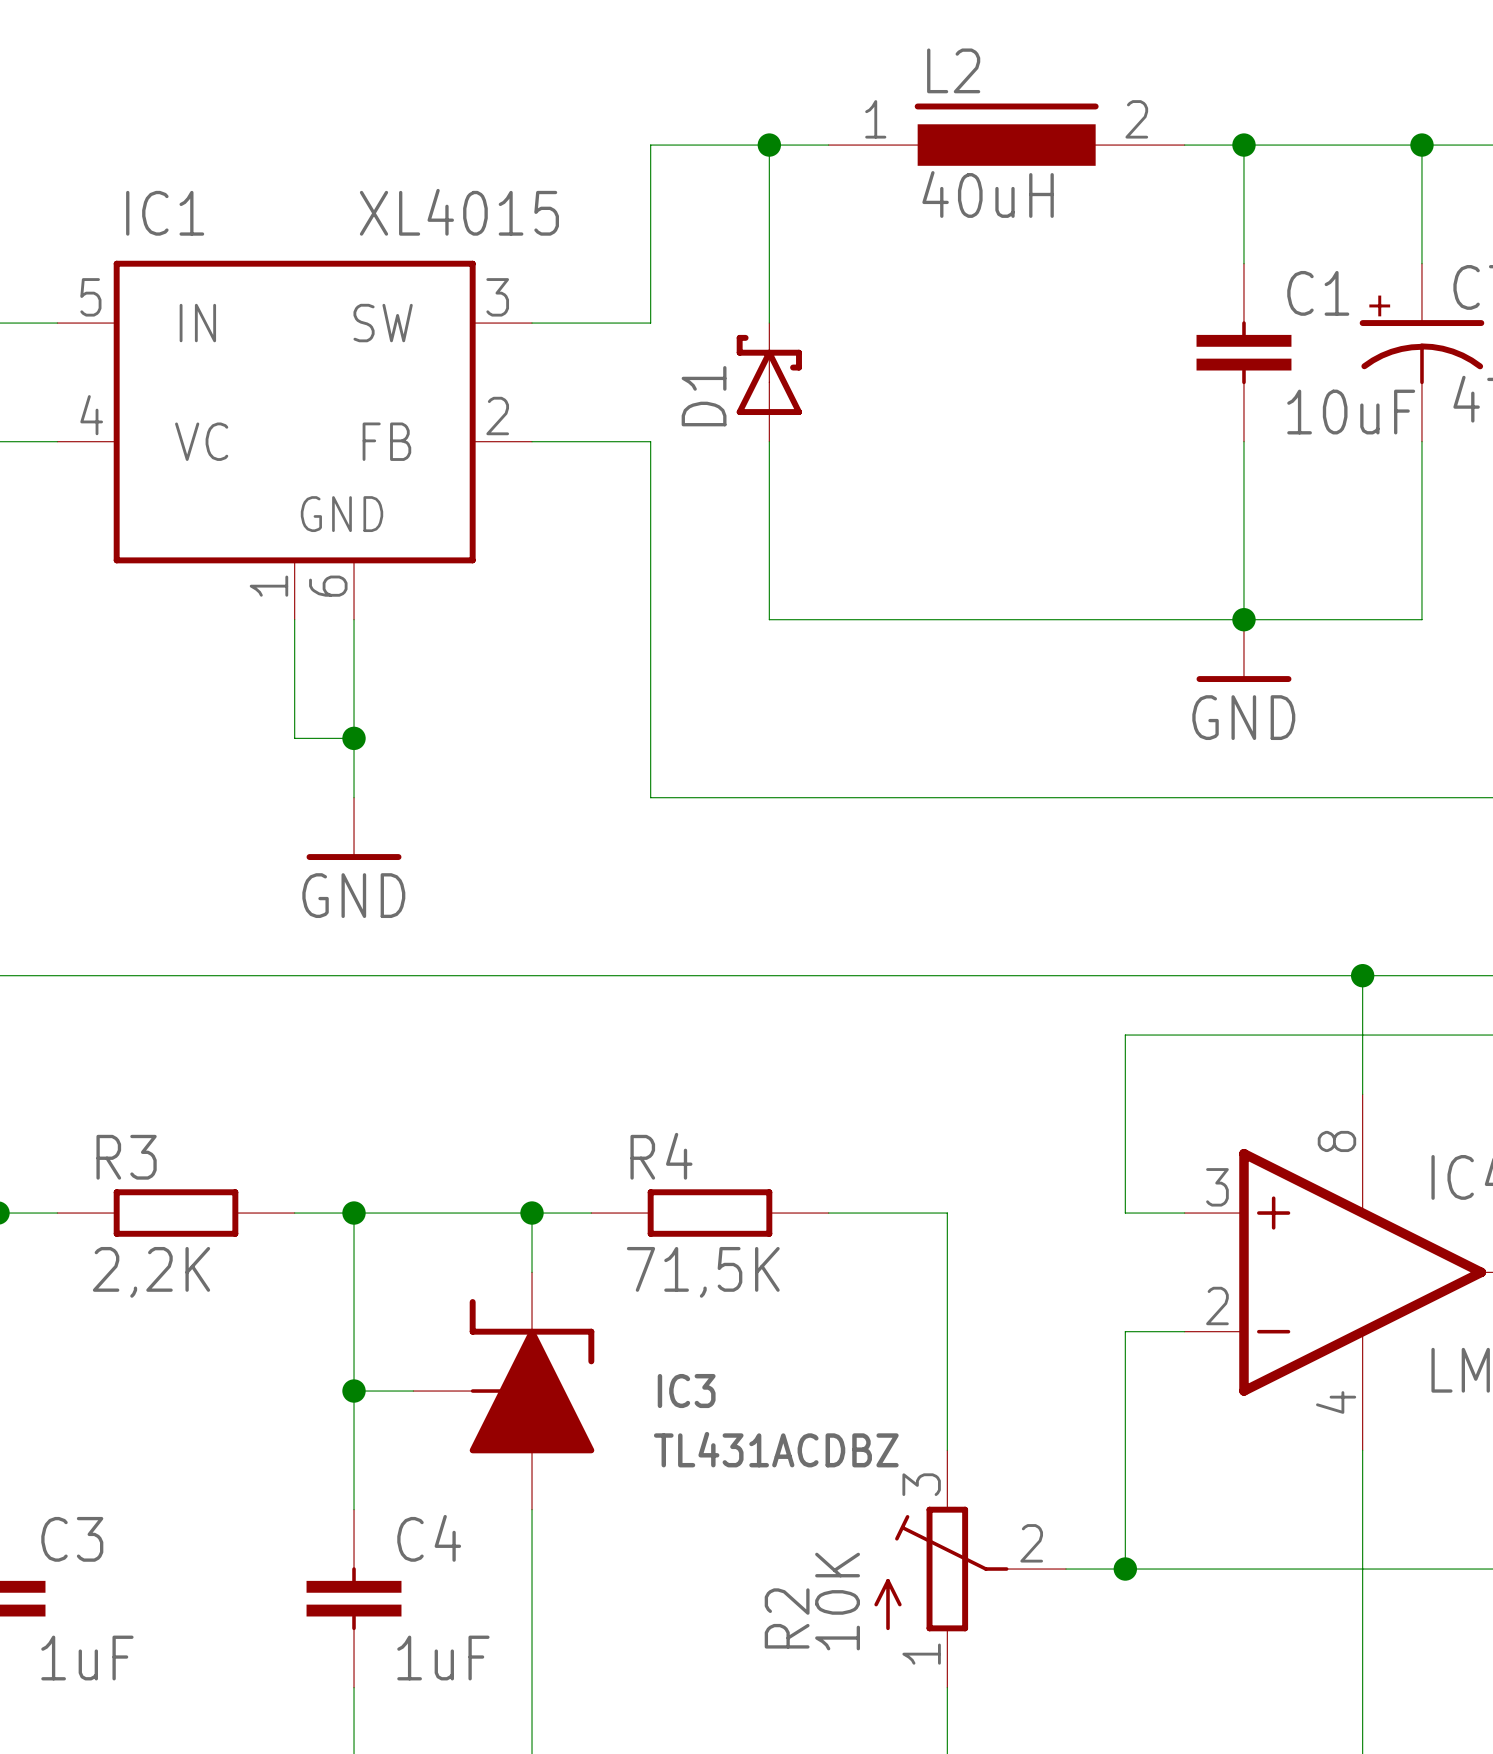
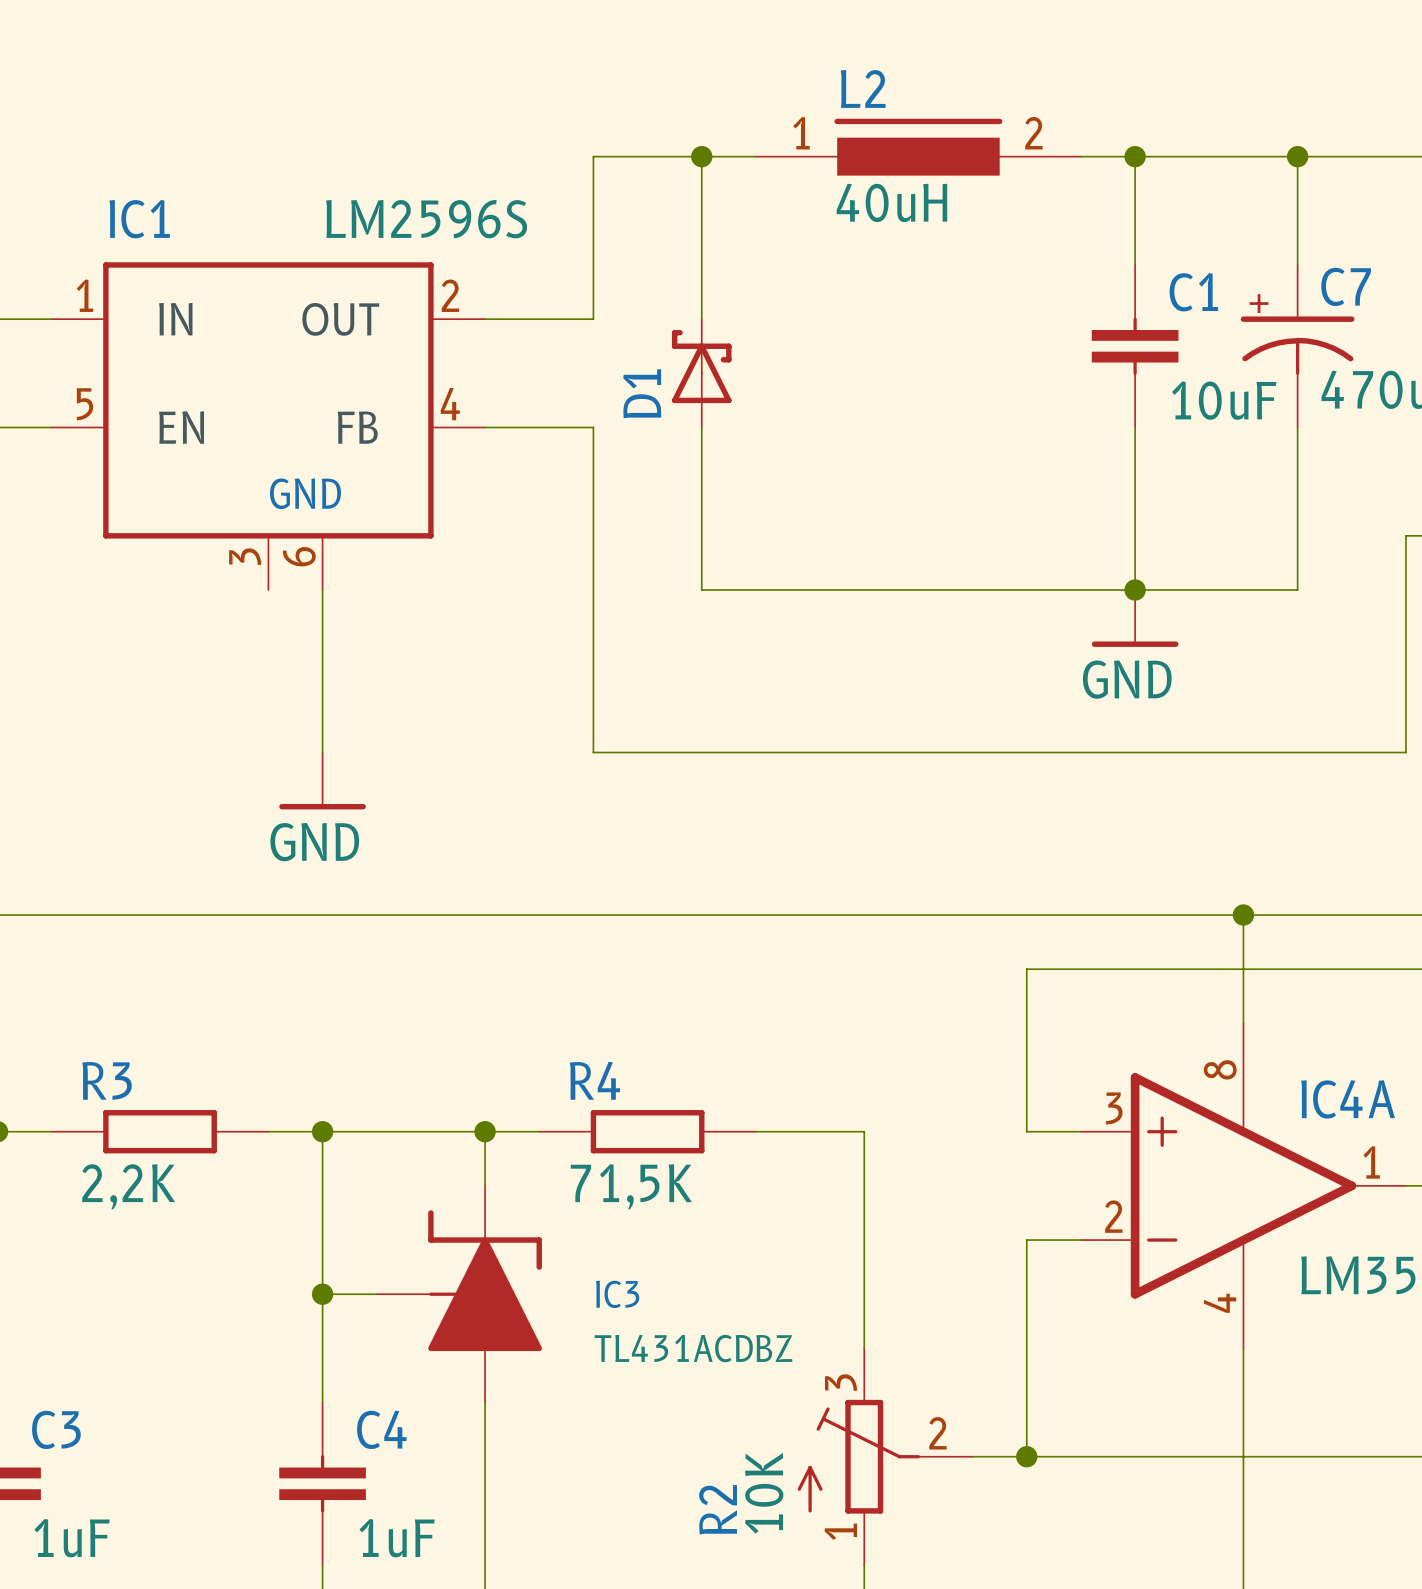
IC1 value: XL4015 (459, 212) -> LM2596S (426, 219)
IC1 pin number: 5 (90, 297) -> 1 (84, 295)
IC1 pin number: 3 (497, 297) -> 2 (450, 295)
IC1 pin name: SW (383, 323) -> OUT (340, 319)
IC1 pin number: 4 (91, 415) -> 5 (85, 404)
IC1 pin number: 2 (497, 416) -> 4 (450, 404)
IC1 pin name: VC (201, 441) -> EN (181, 427)
IC1 pin number: 1 (268, 586) -> 3 (245, 556)
wire: (294, 619) (294, 738) (354, 738) -> none
junction: (354, 738) -> none

